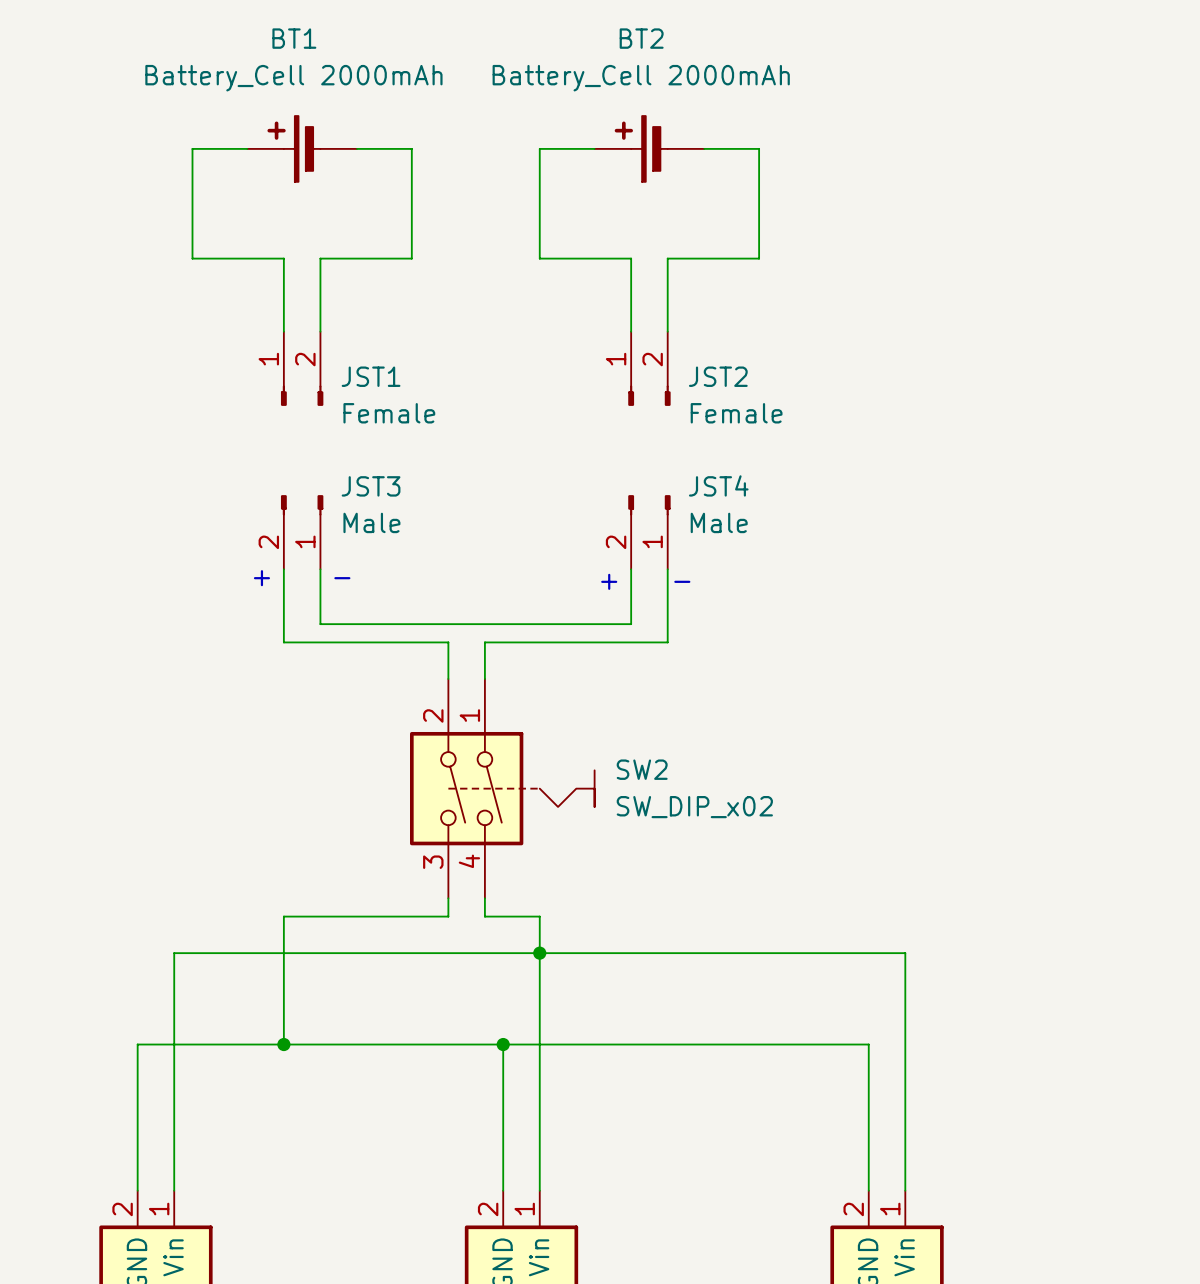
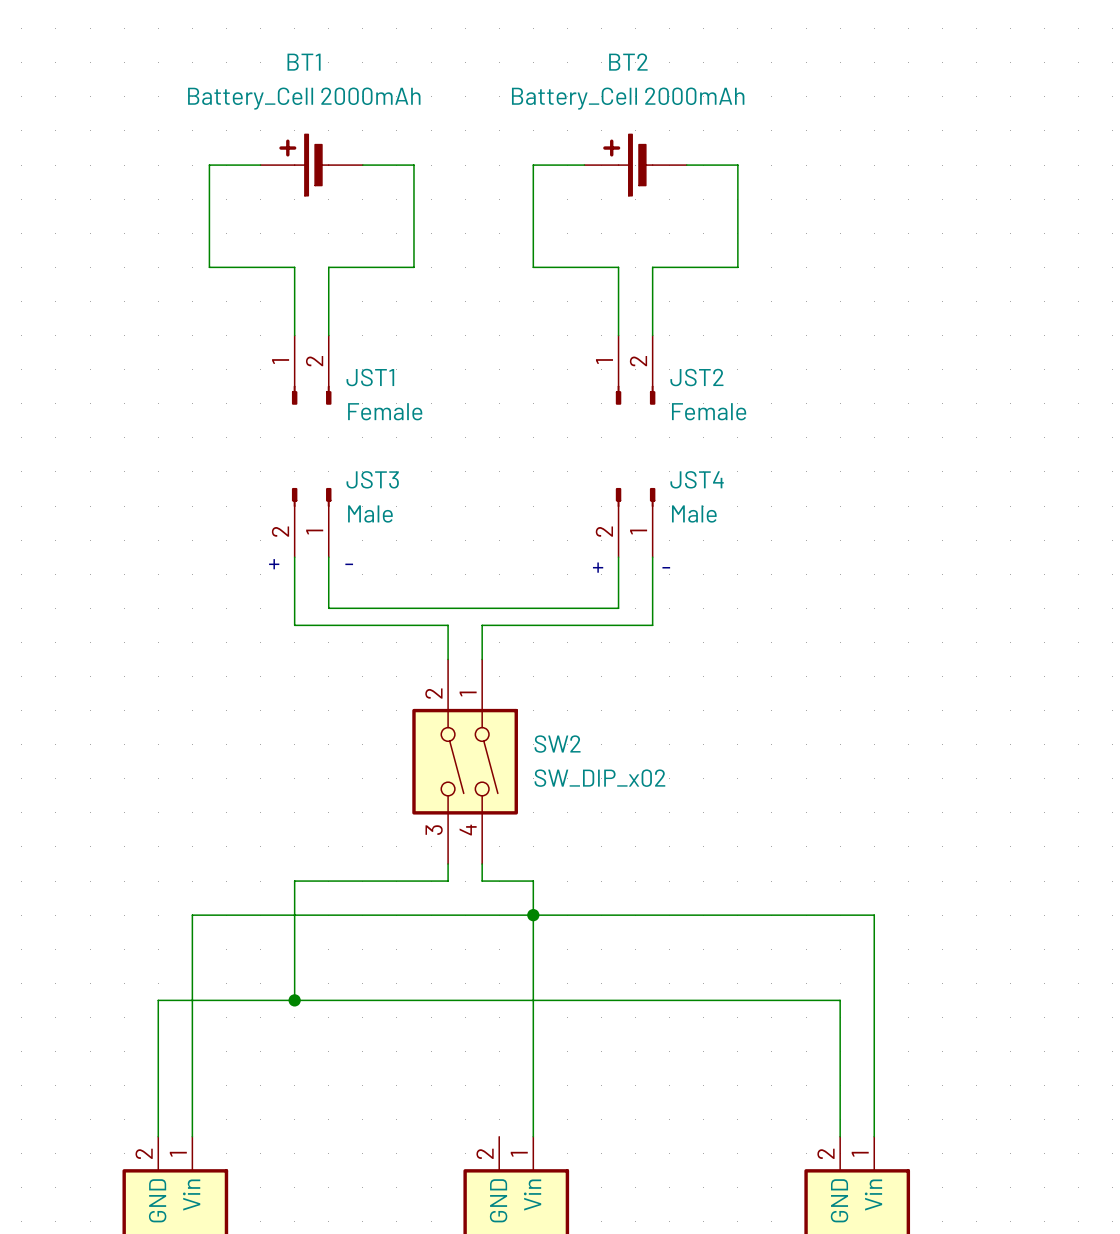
SW2 symbol: [410, 678, 595, 899] -> [412, 659, 518, 865]
SW2 name position: SW2 (642, 769) -> SW2 (557, 744)
SW2 value position: SW_DIP_x02 (694, 807) -> SW_DIP_x02 (599, 778)
wire: (503, 1044) (503, 1190) -> none
junction: (503, 1044) -> none

